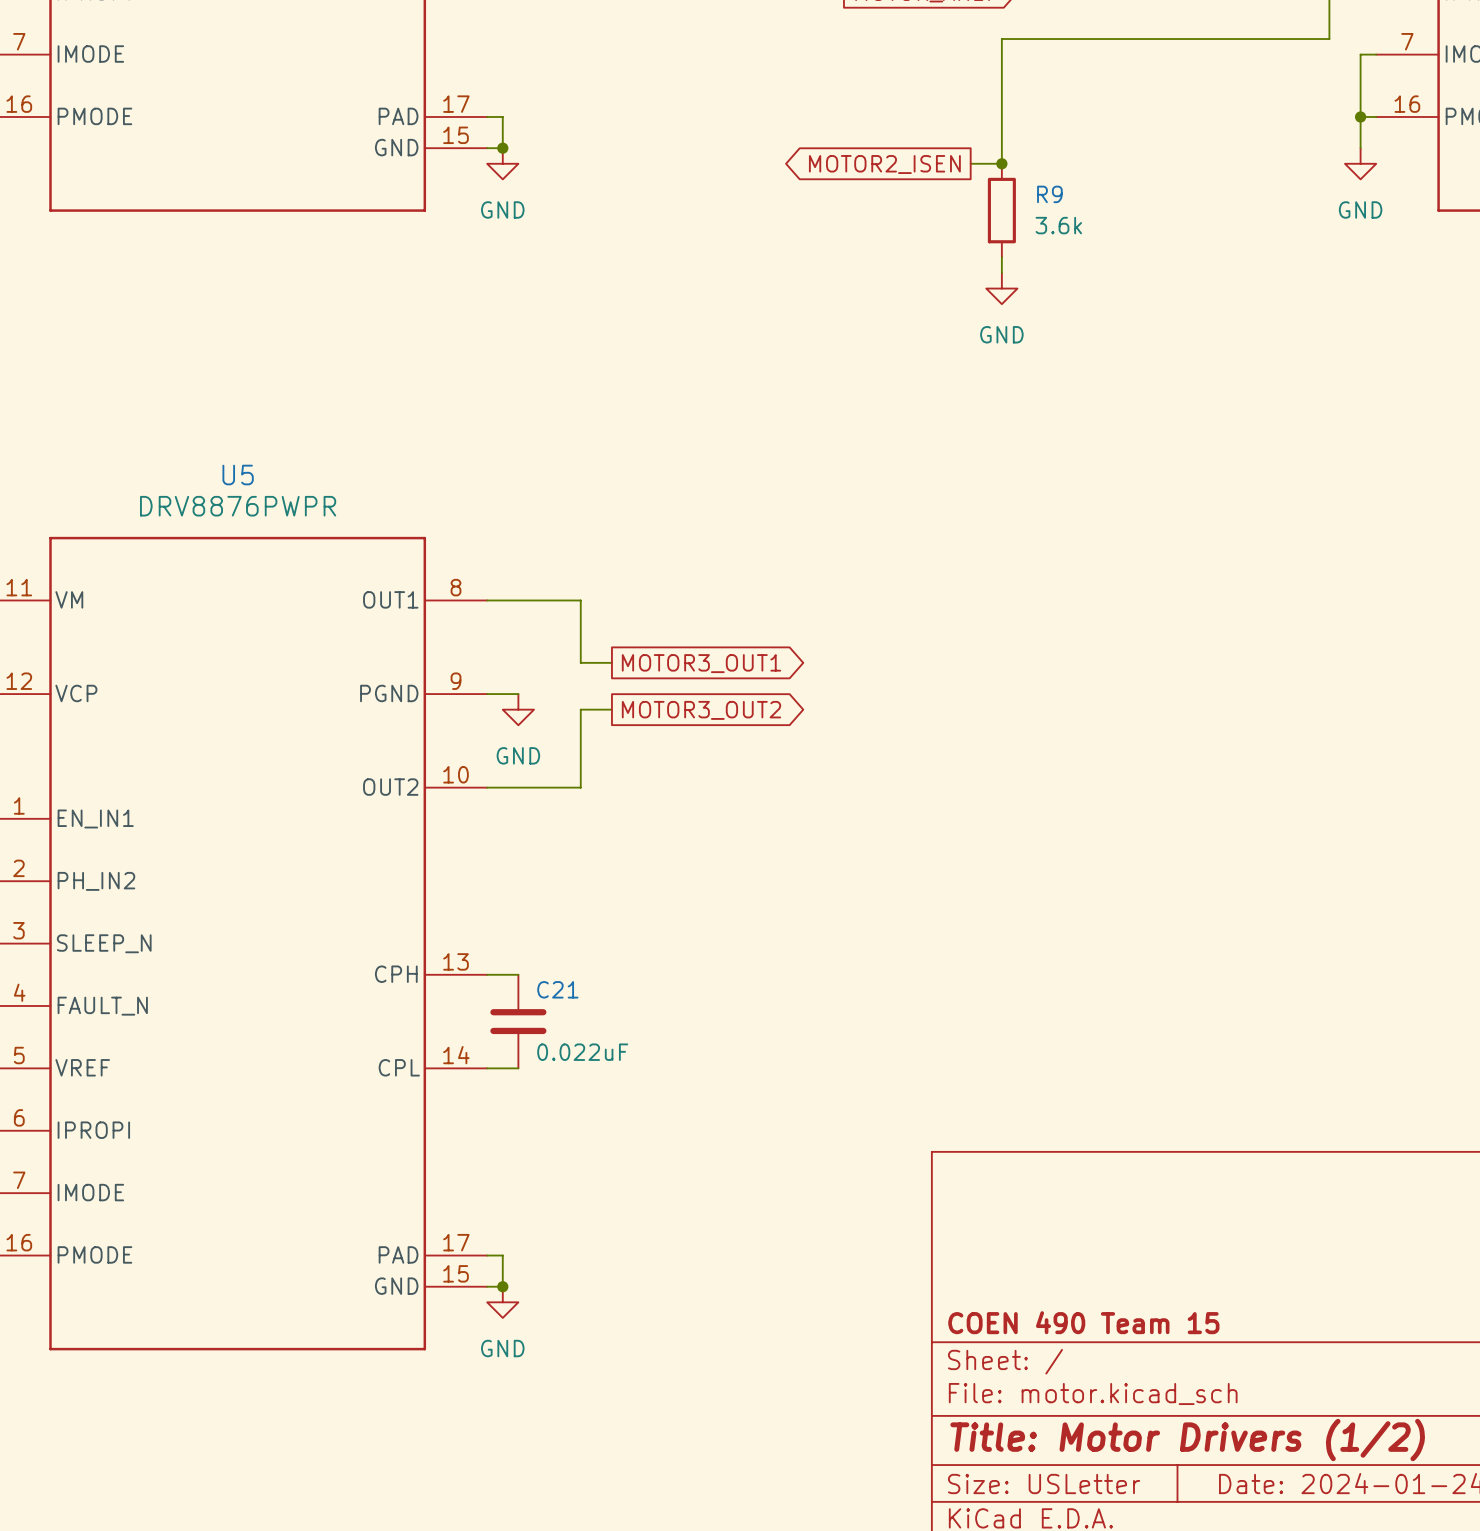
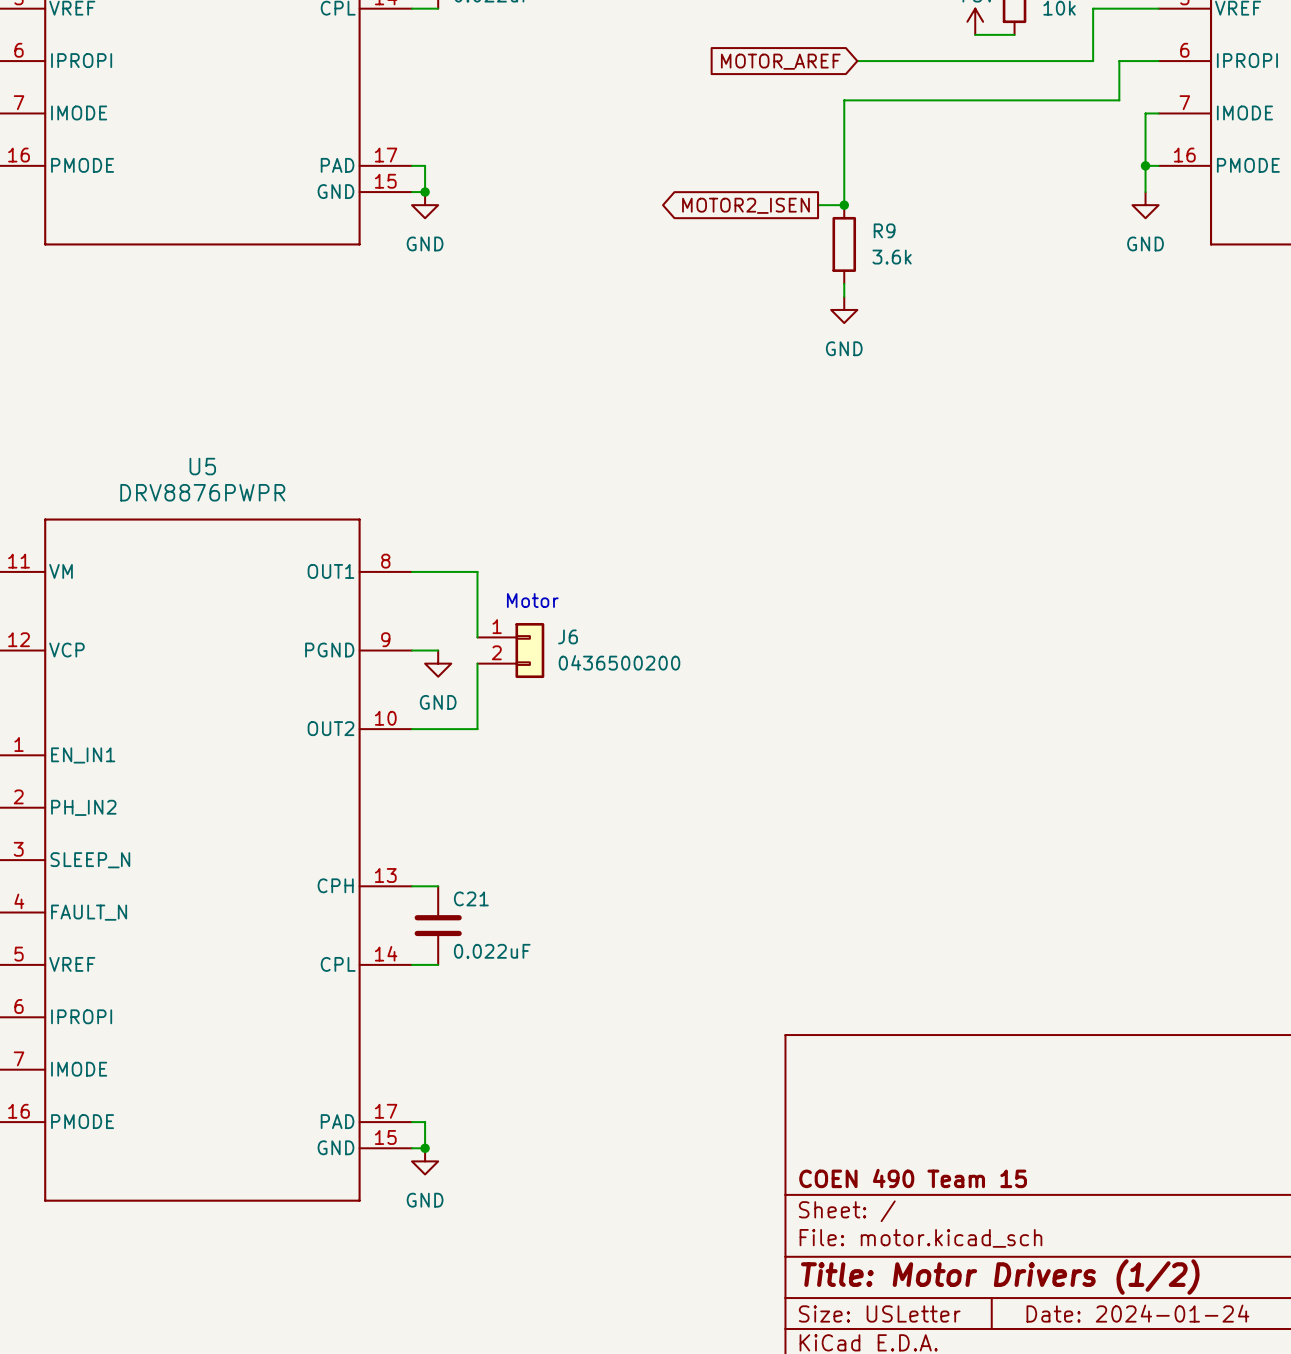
wire: (565, 600) (580, 600) (580, 662) (611, 662) -> (477, 571) (477, 637)
text: none -> Motor (532, 600)
global label: MOTOR3_OUT1 (701, 663) -> none
J6: none -> 0436500200 (510, 650)
wire: (611, 709) (580, 709) (580, 787) (565, 787) -> (477, 663) (477, 729)
global label: MOTOR3_OUT2 (701, 710) -> none

